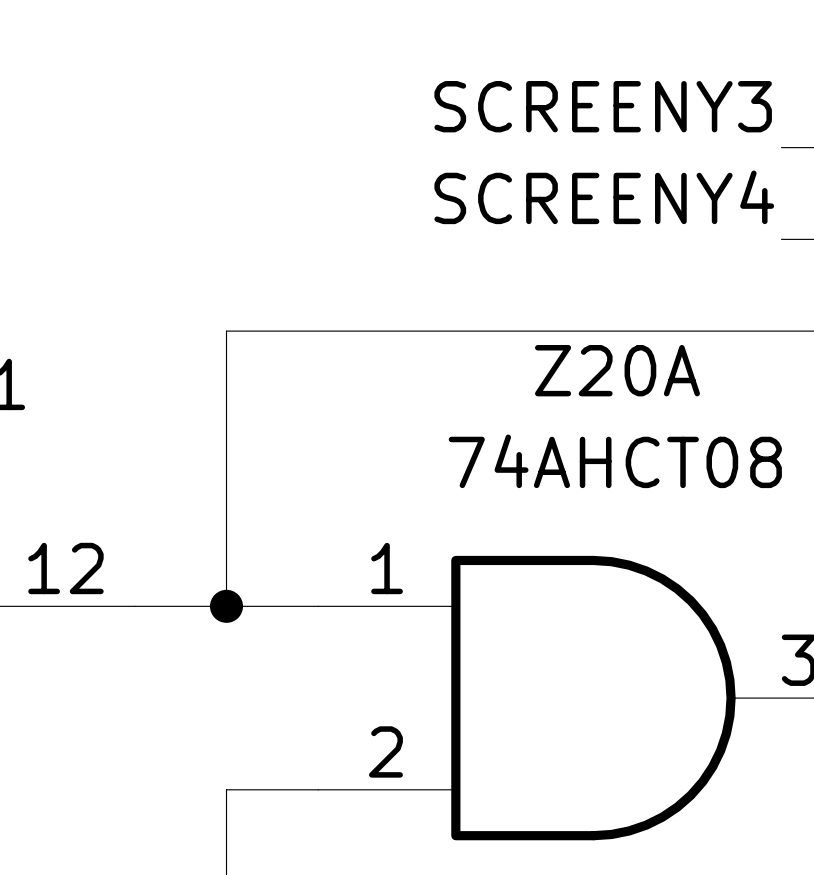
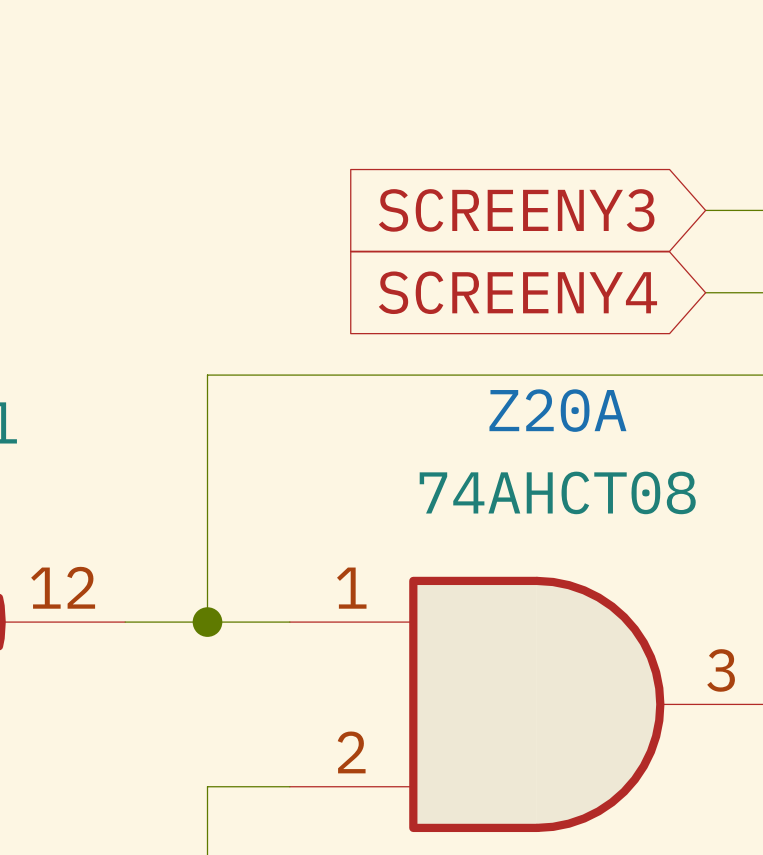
label: SCREENY3 (603, 106) -> none
global label: none -> SCREENY3 (516, 210)
label: SCREENY4 (604, 197) -> none
global label: none -> SCREENY4 (517, 292)

